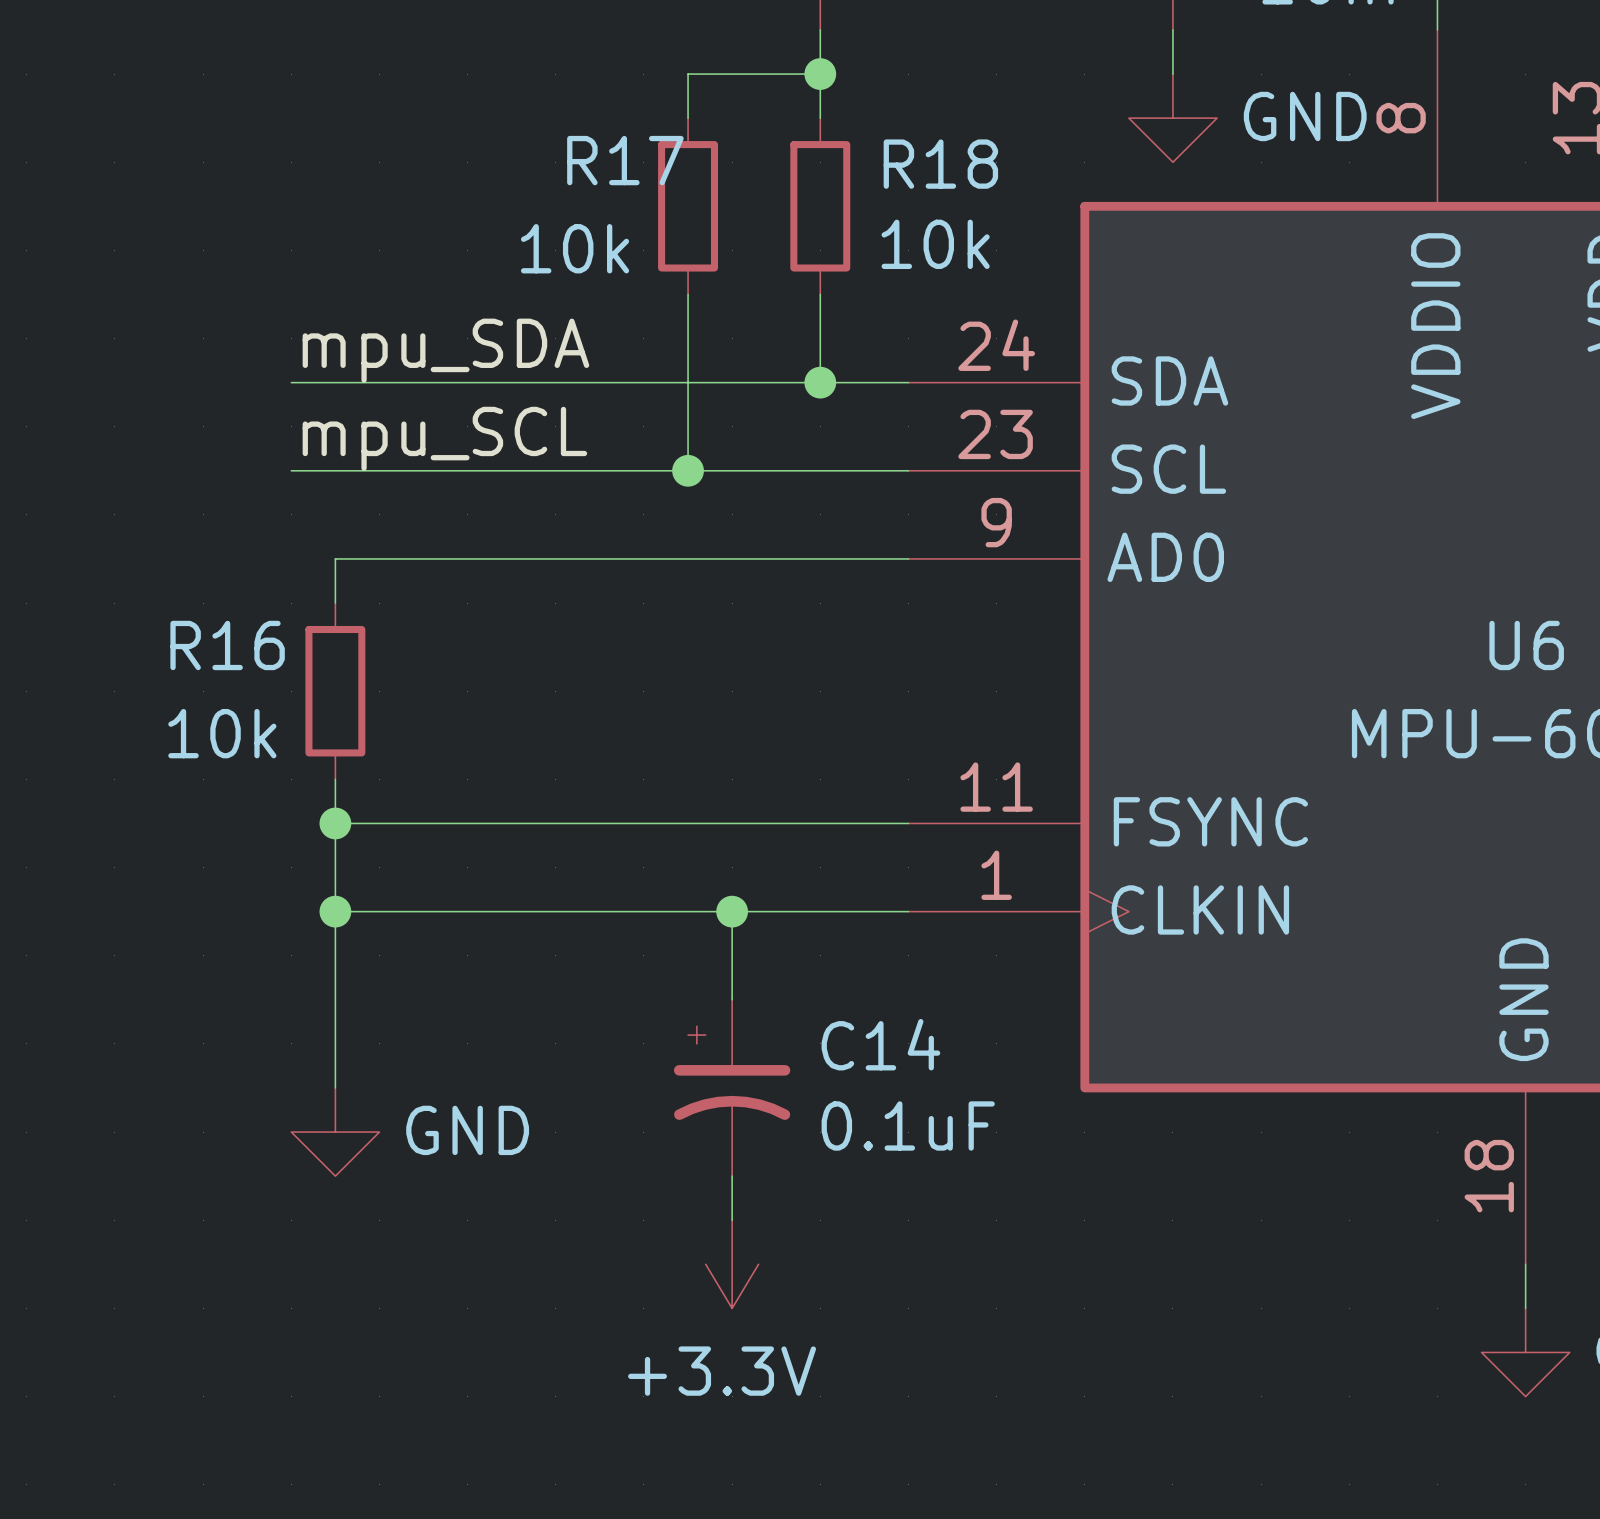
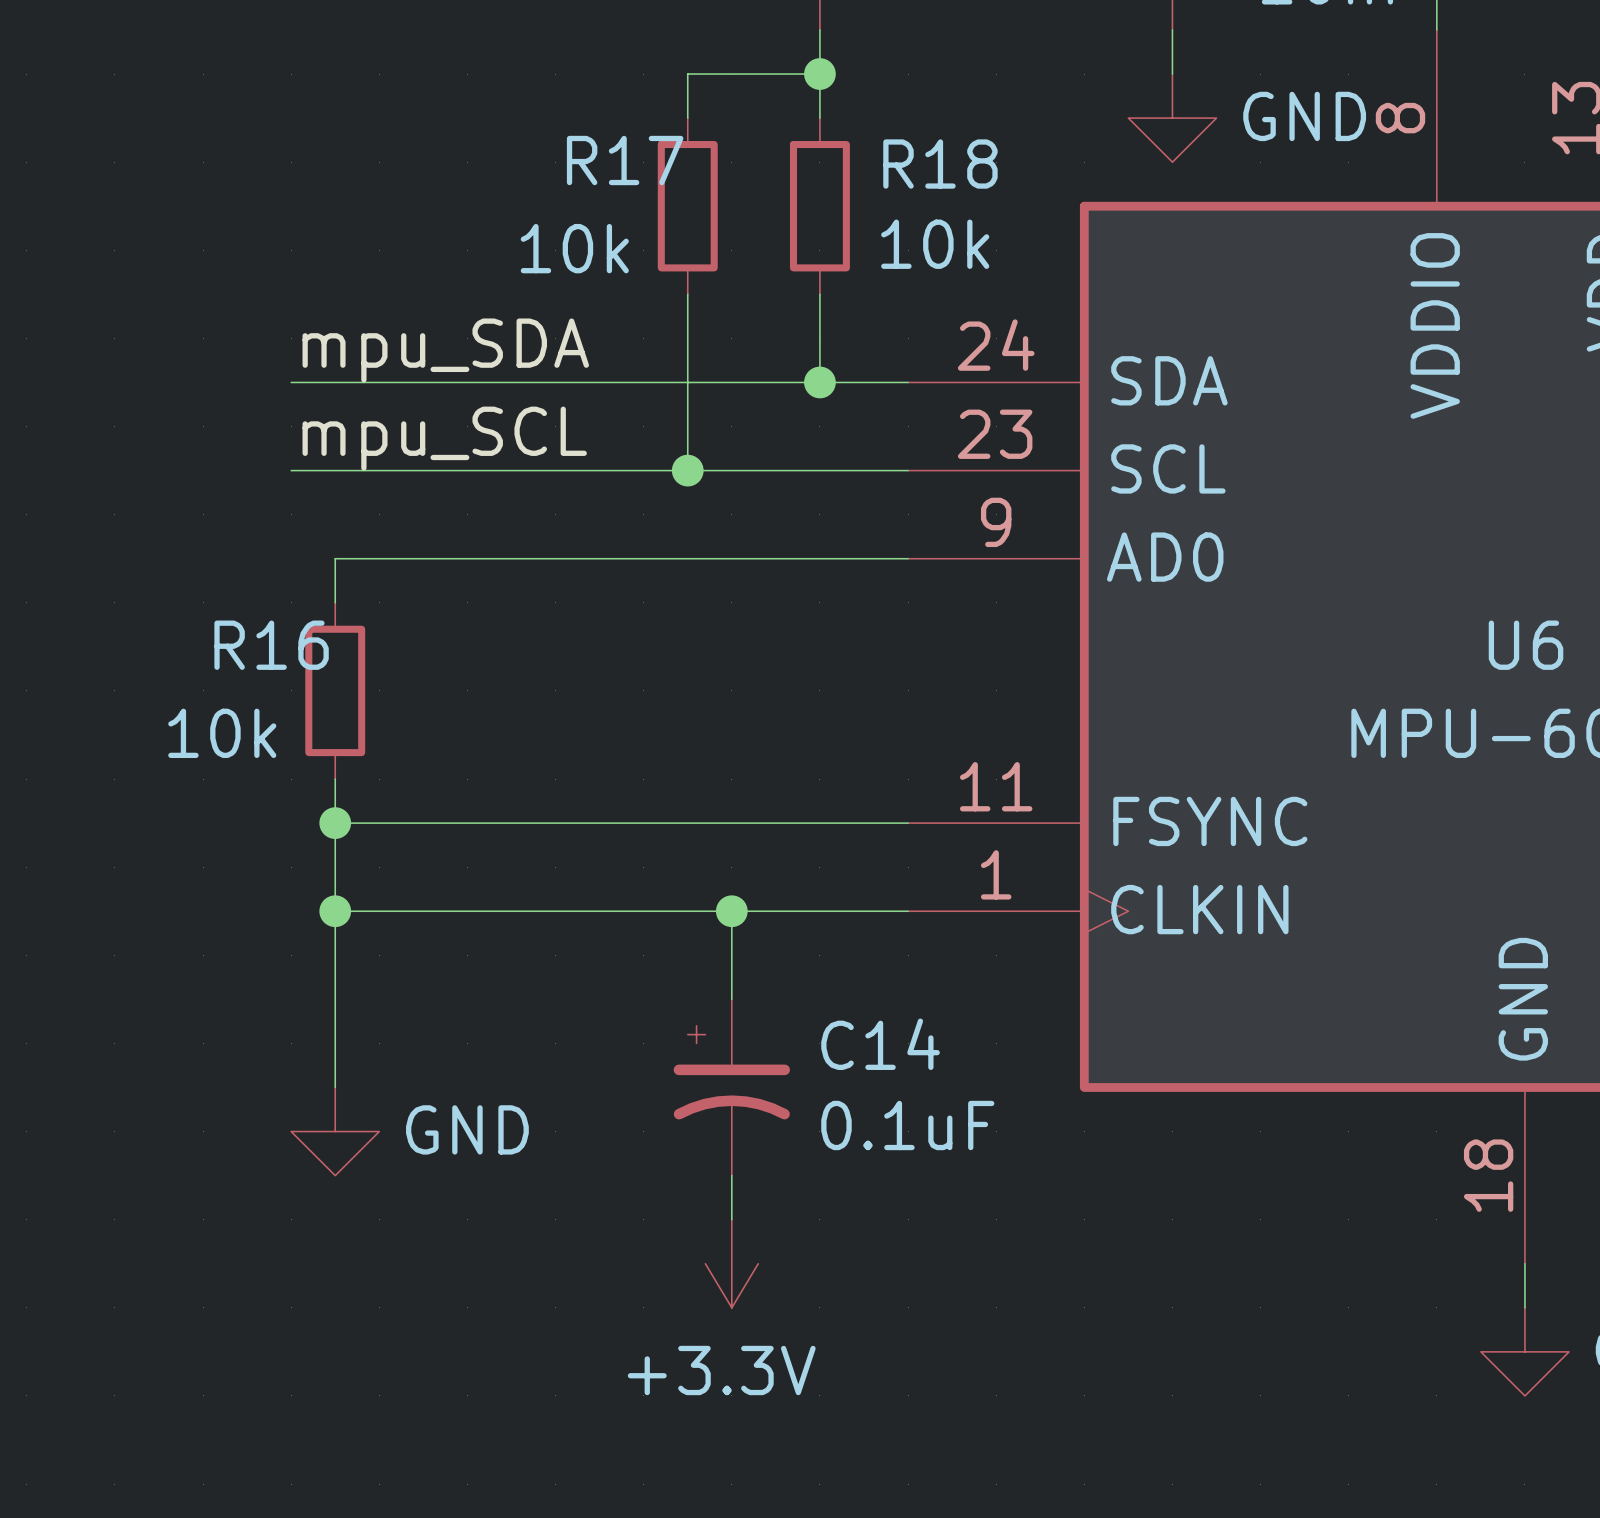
R16 name position: R16 (227, 645) -> R16 (271, 645)

